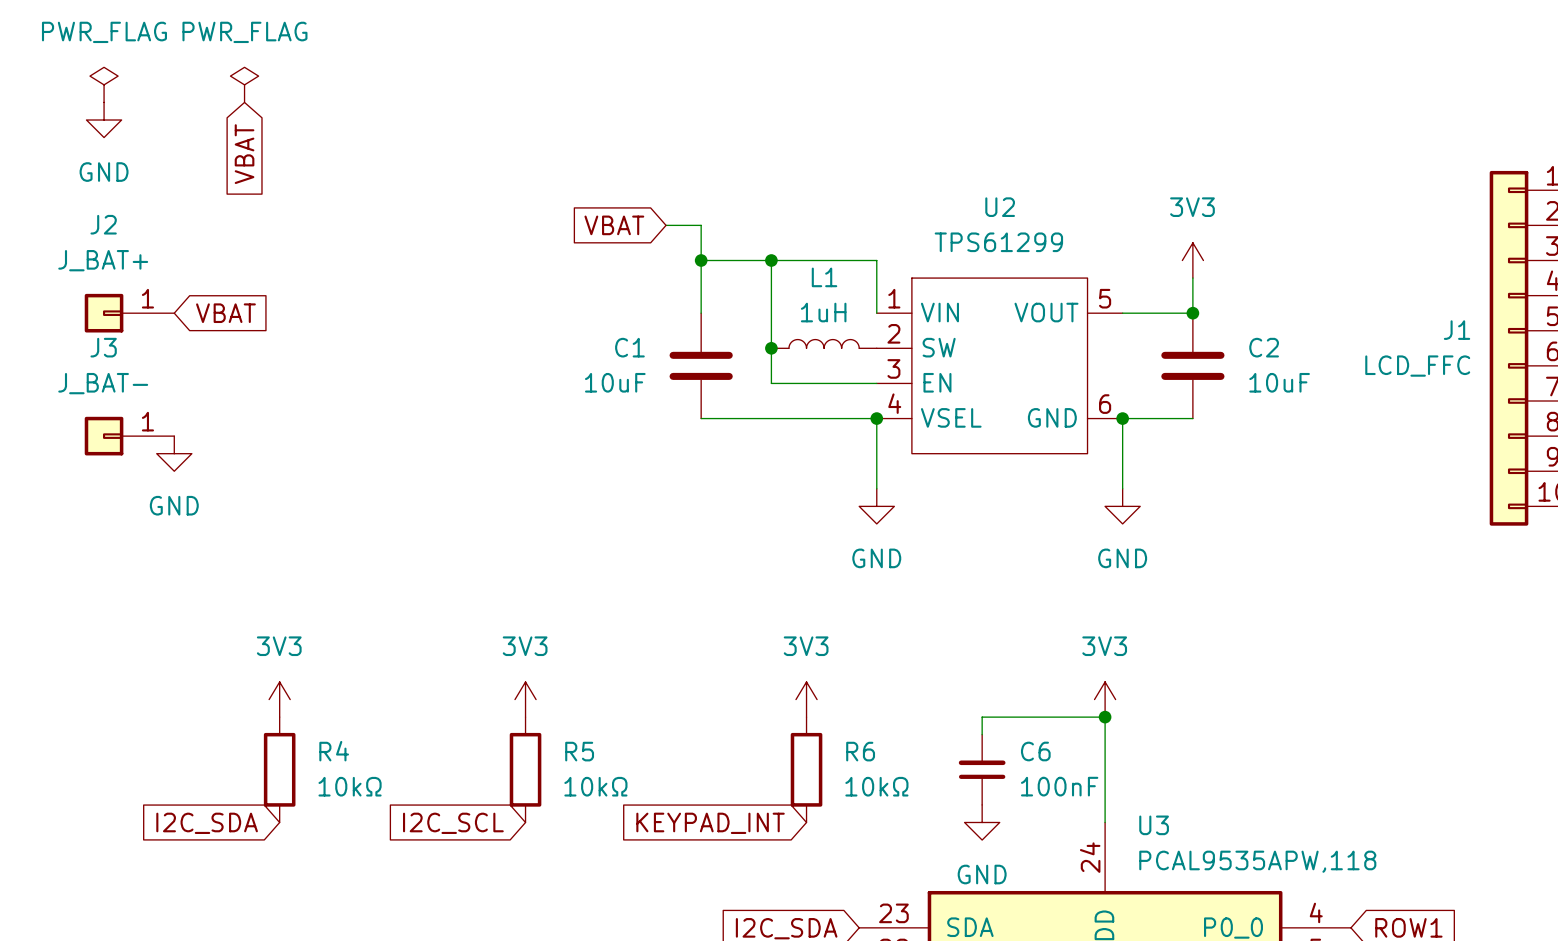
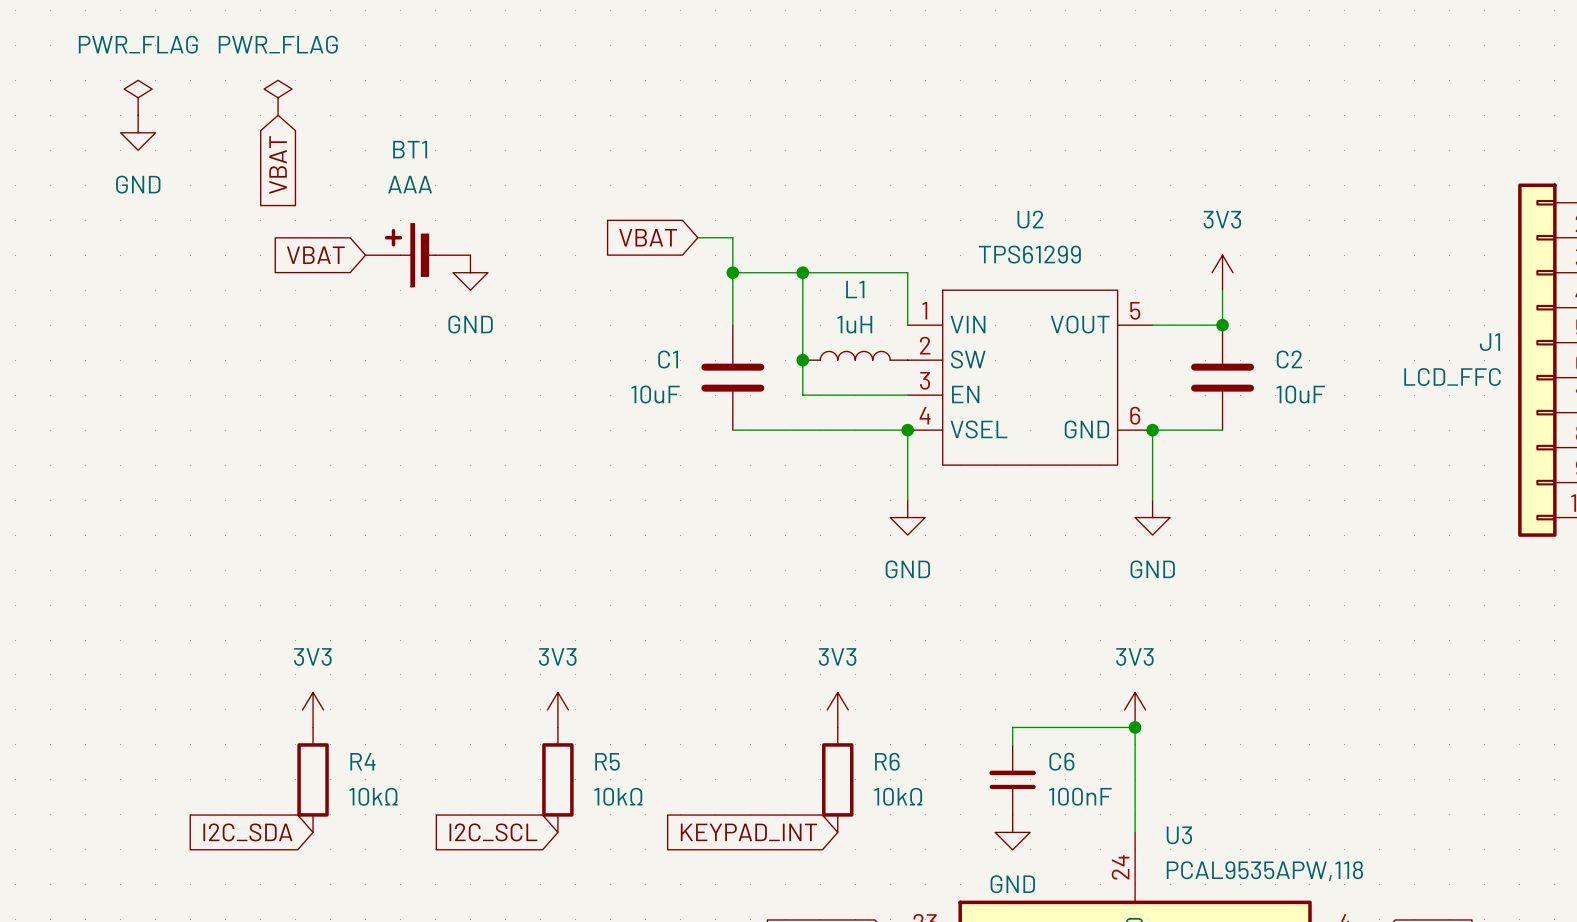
BT1: none -> AAA (417, 255)
J2: J_BAT+ (129, 313) -> none
global label rotation: 0° (225, 313) -> 180° (315, 255)
J3: J_BAT- (129, 436) -> none
power symbol position: GND (174, 453) -> GND (470, 272)

